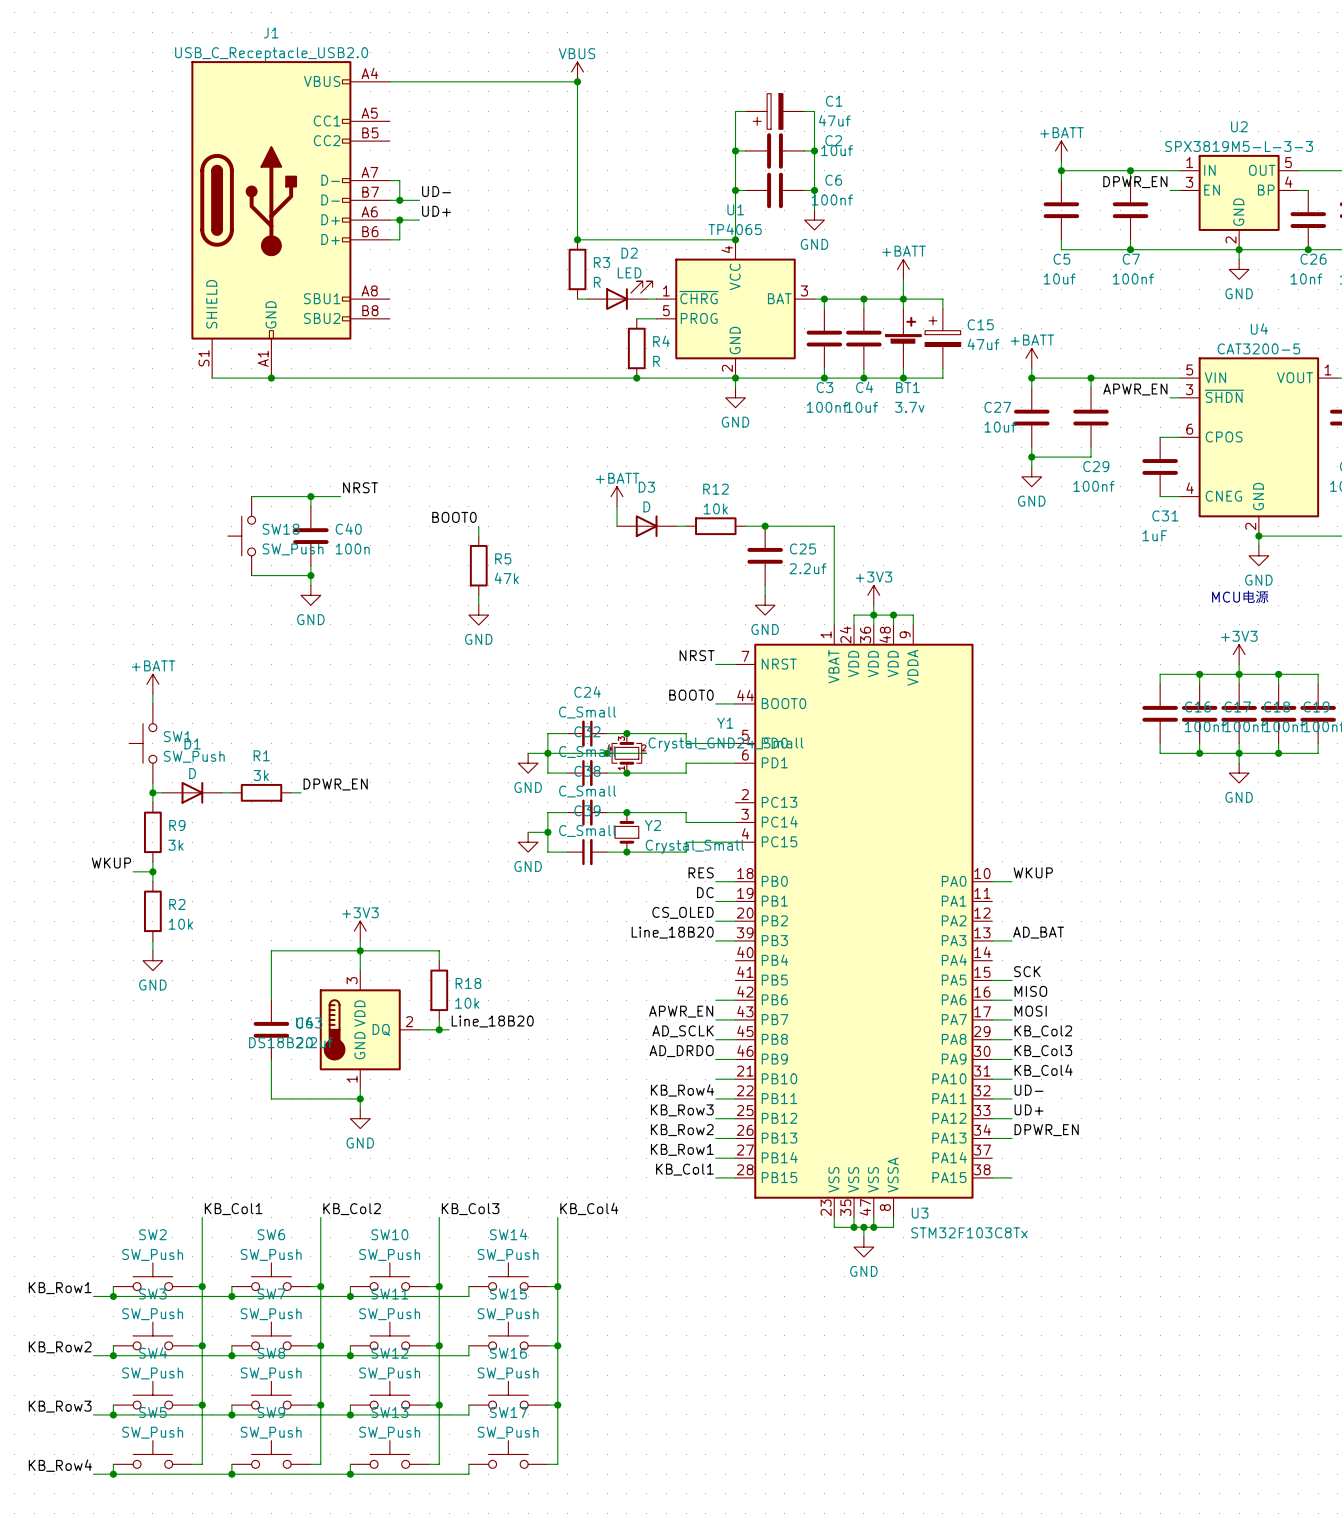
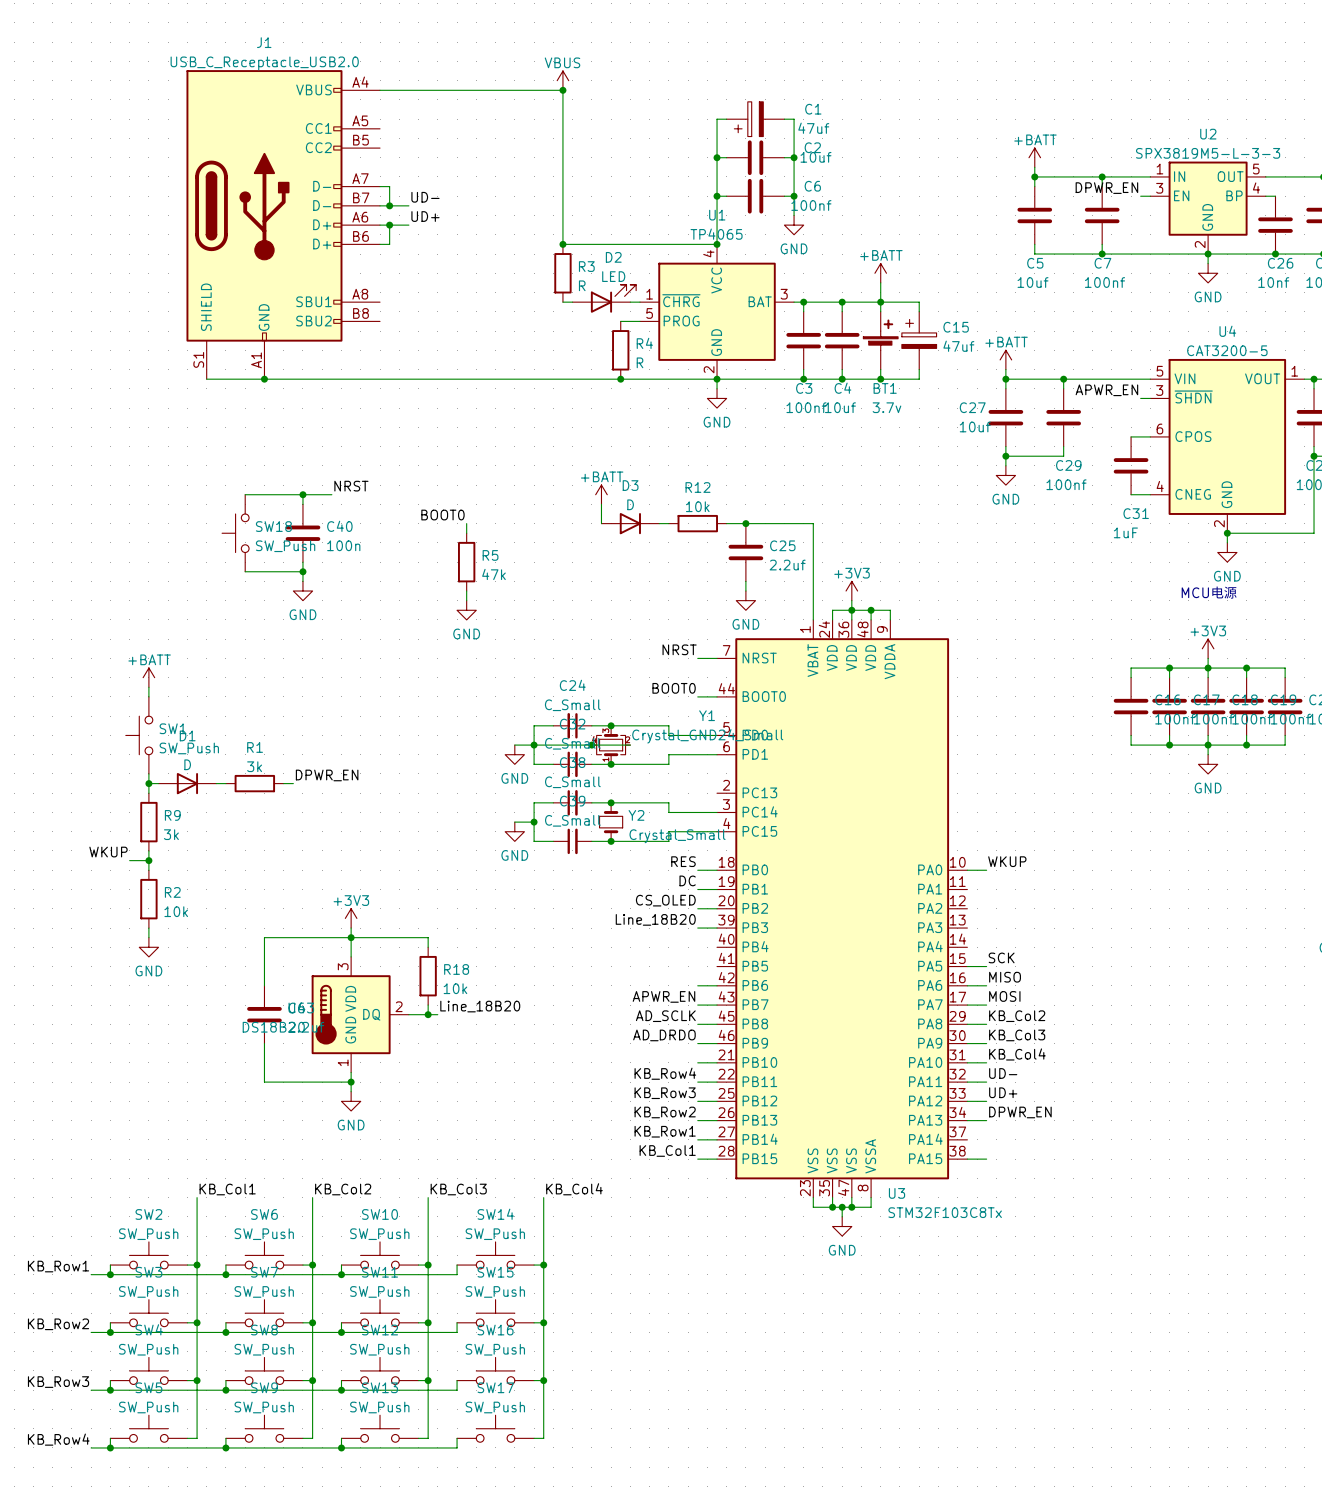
label: AD_BAT (1038, 932) -> none
wire: (992, 940) (1012, 940) -> none

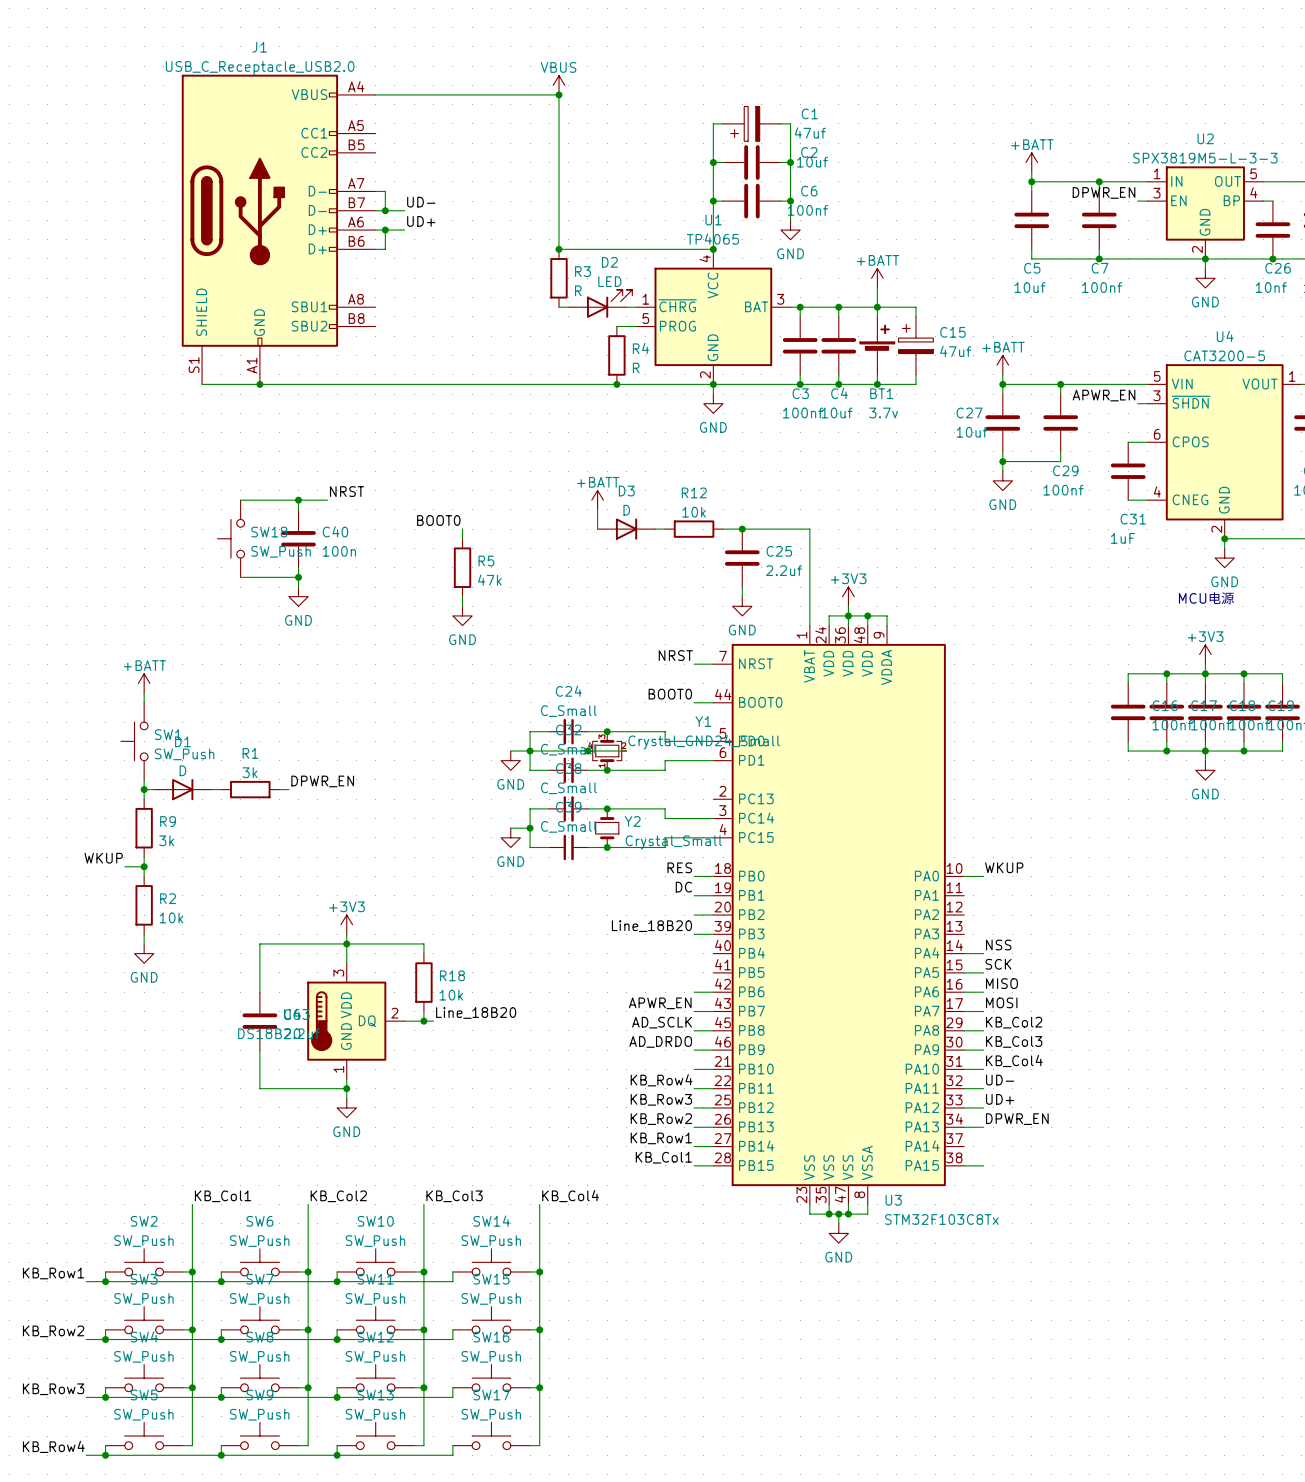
label: CS_OLED (665, 900) -> none
label: none -> NSS (998, 945)
wire: none -> (964, 953) (983, 953)

